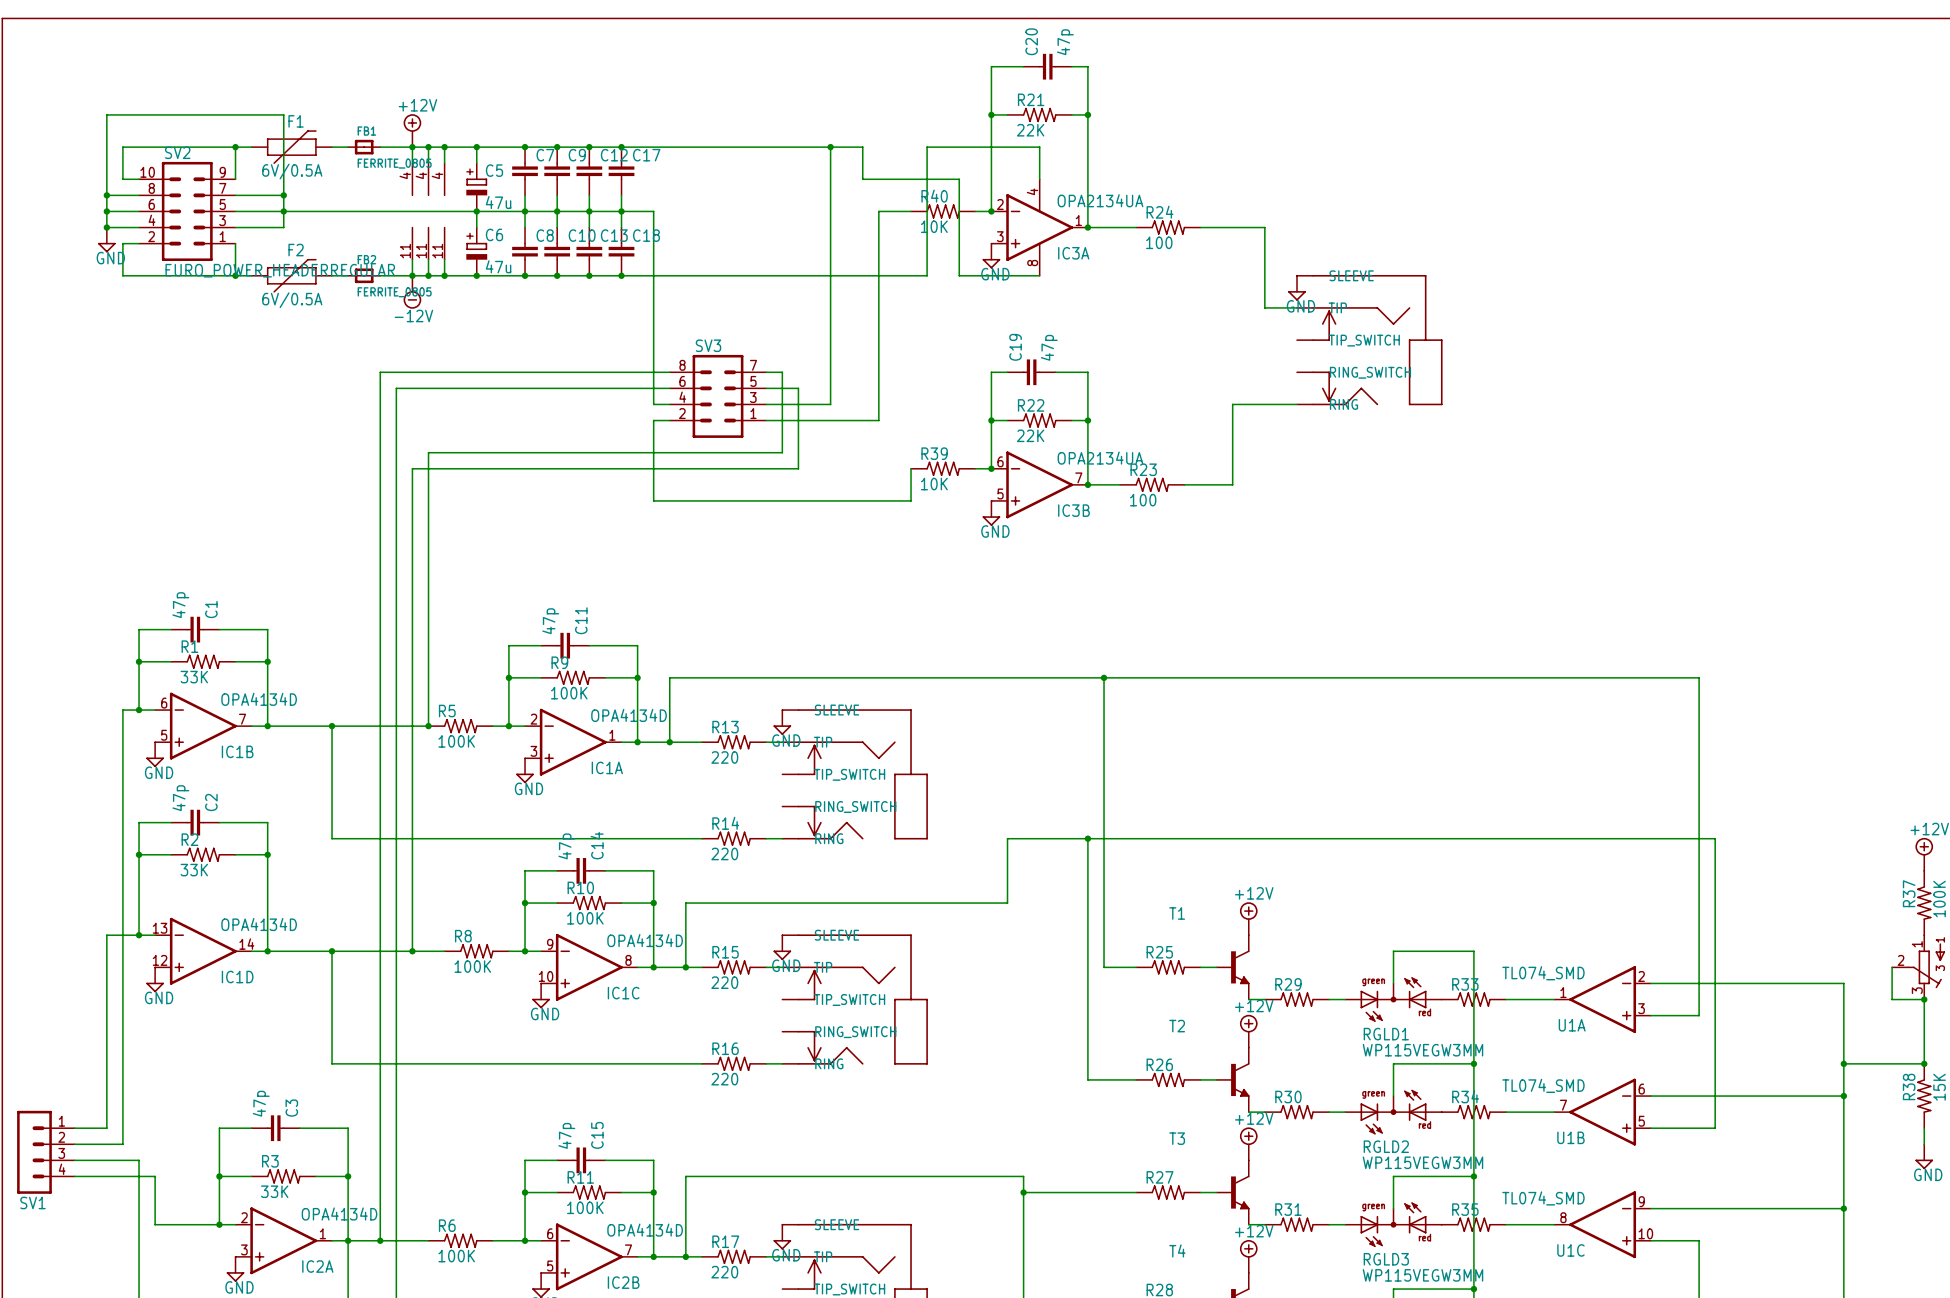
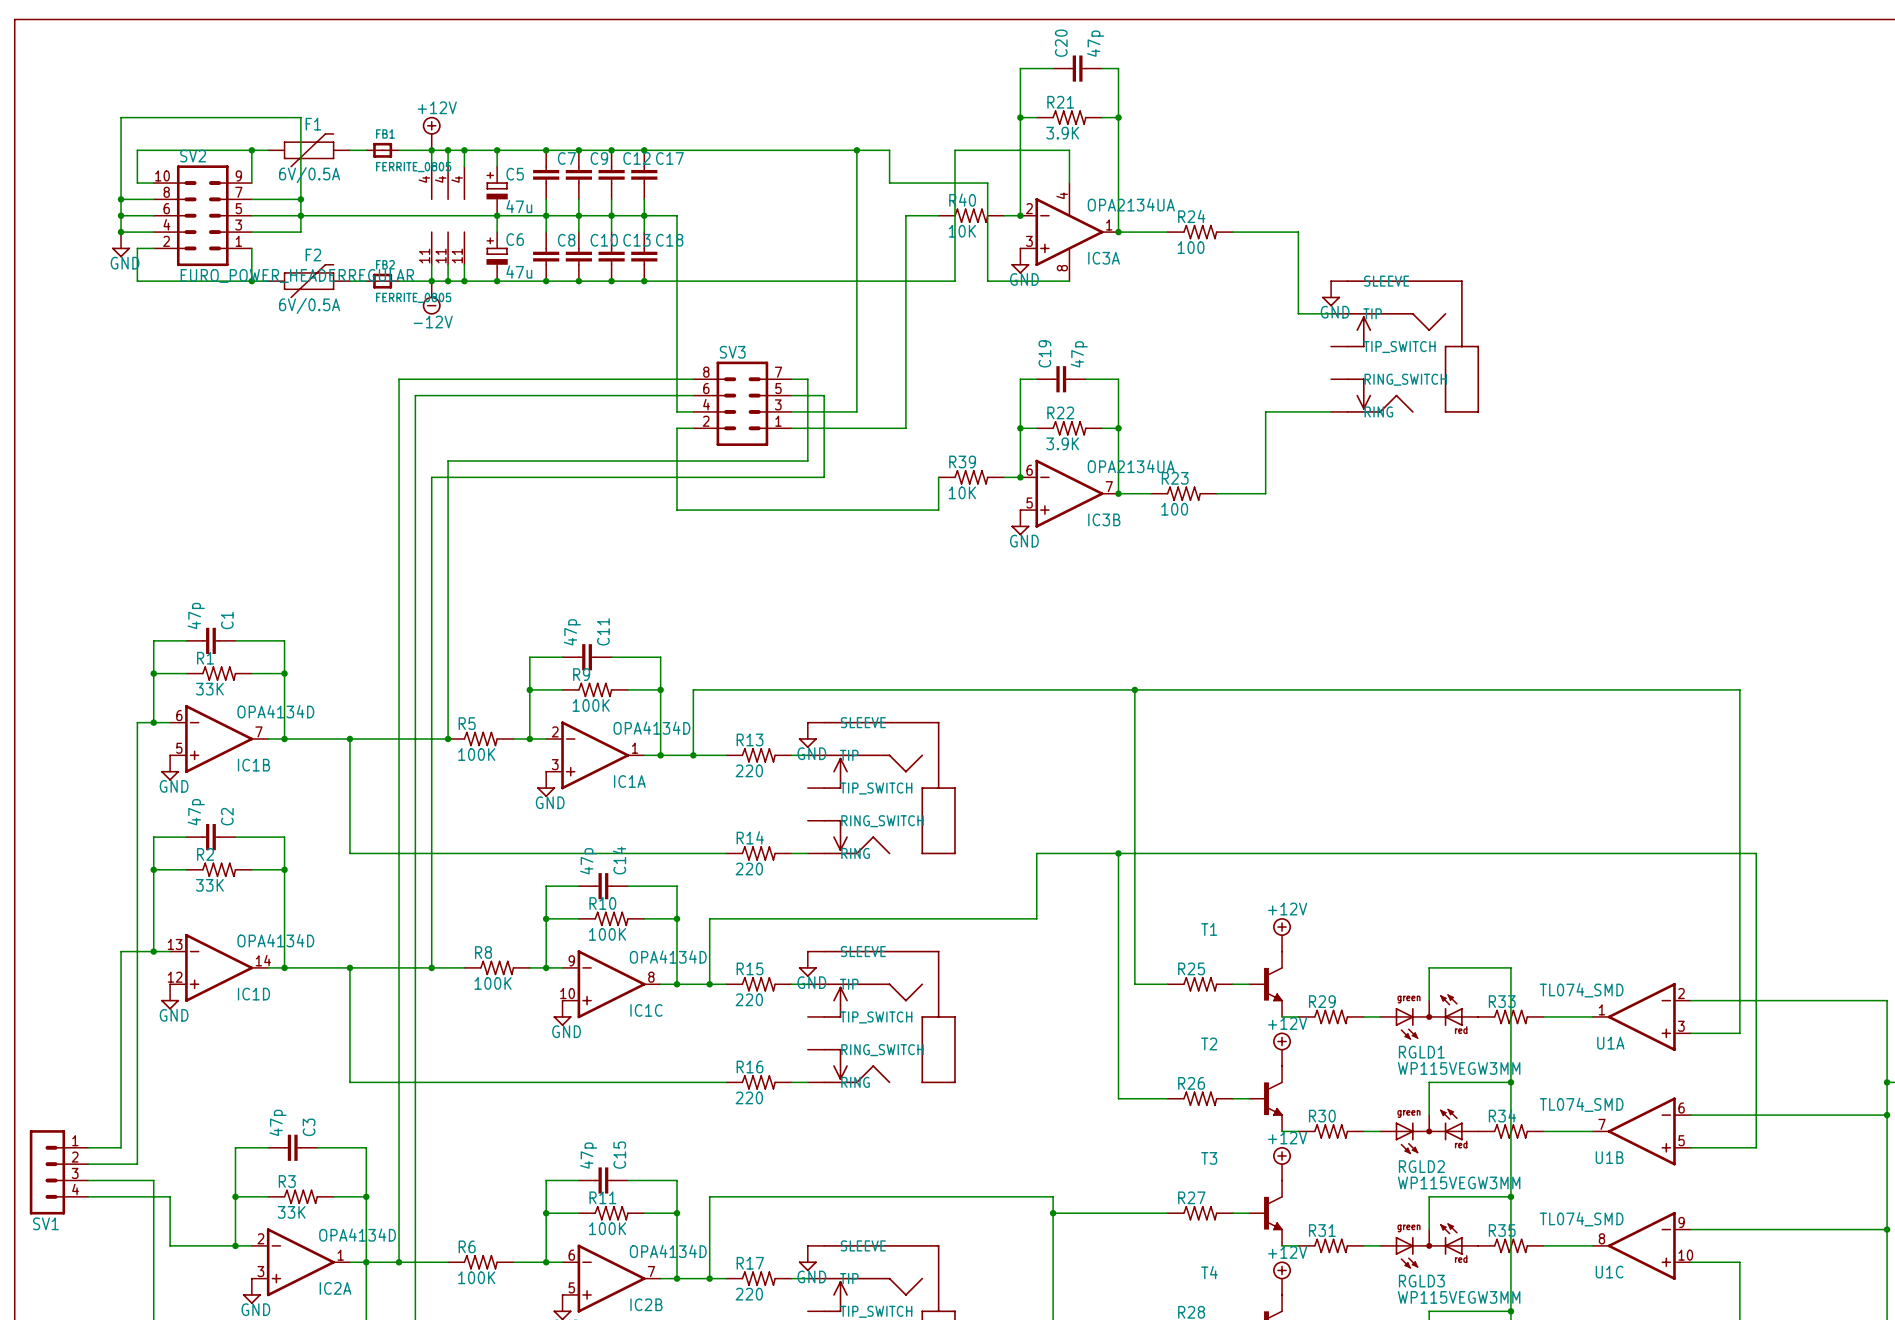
R21 value: 22K (1030, 130) -> 3.9K (1062, 133)
R22 value: 22K (1030, 435) -> 3.9K (1062, 443)

